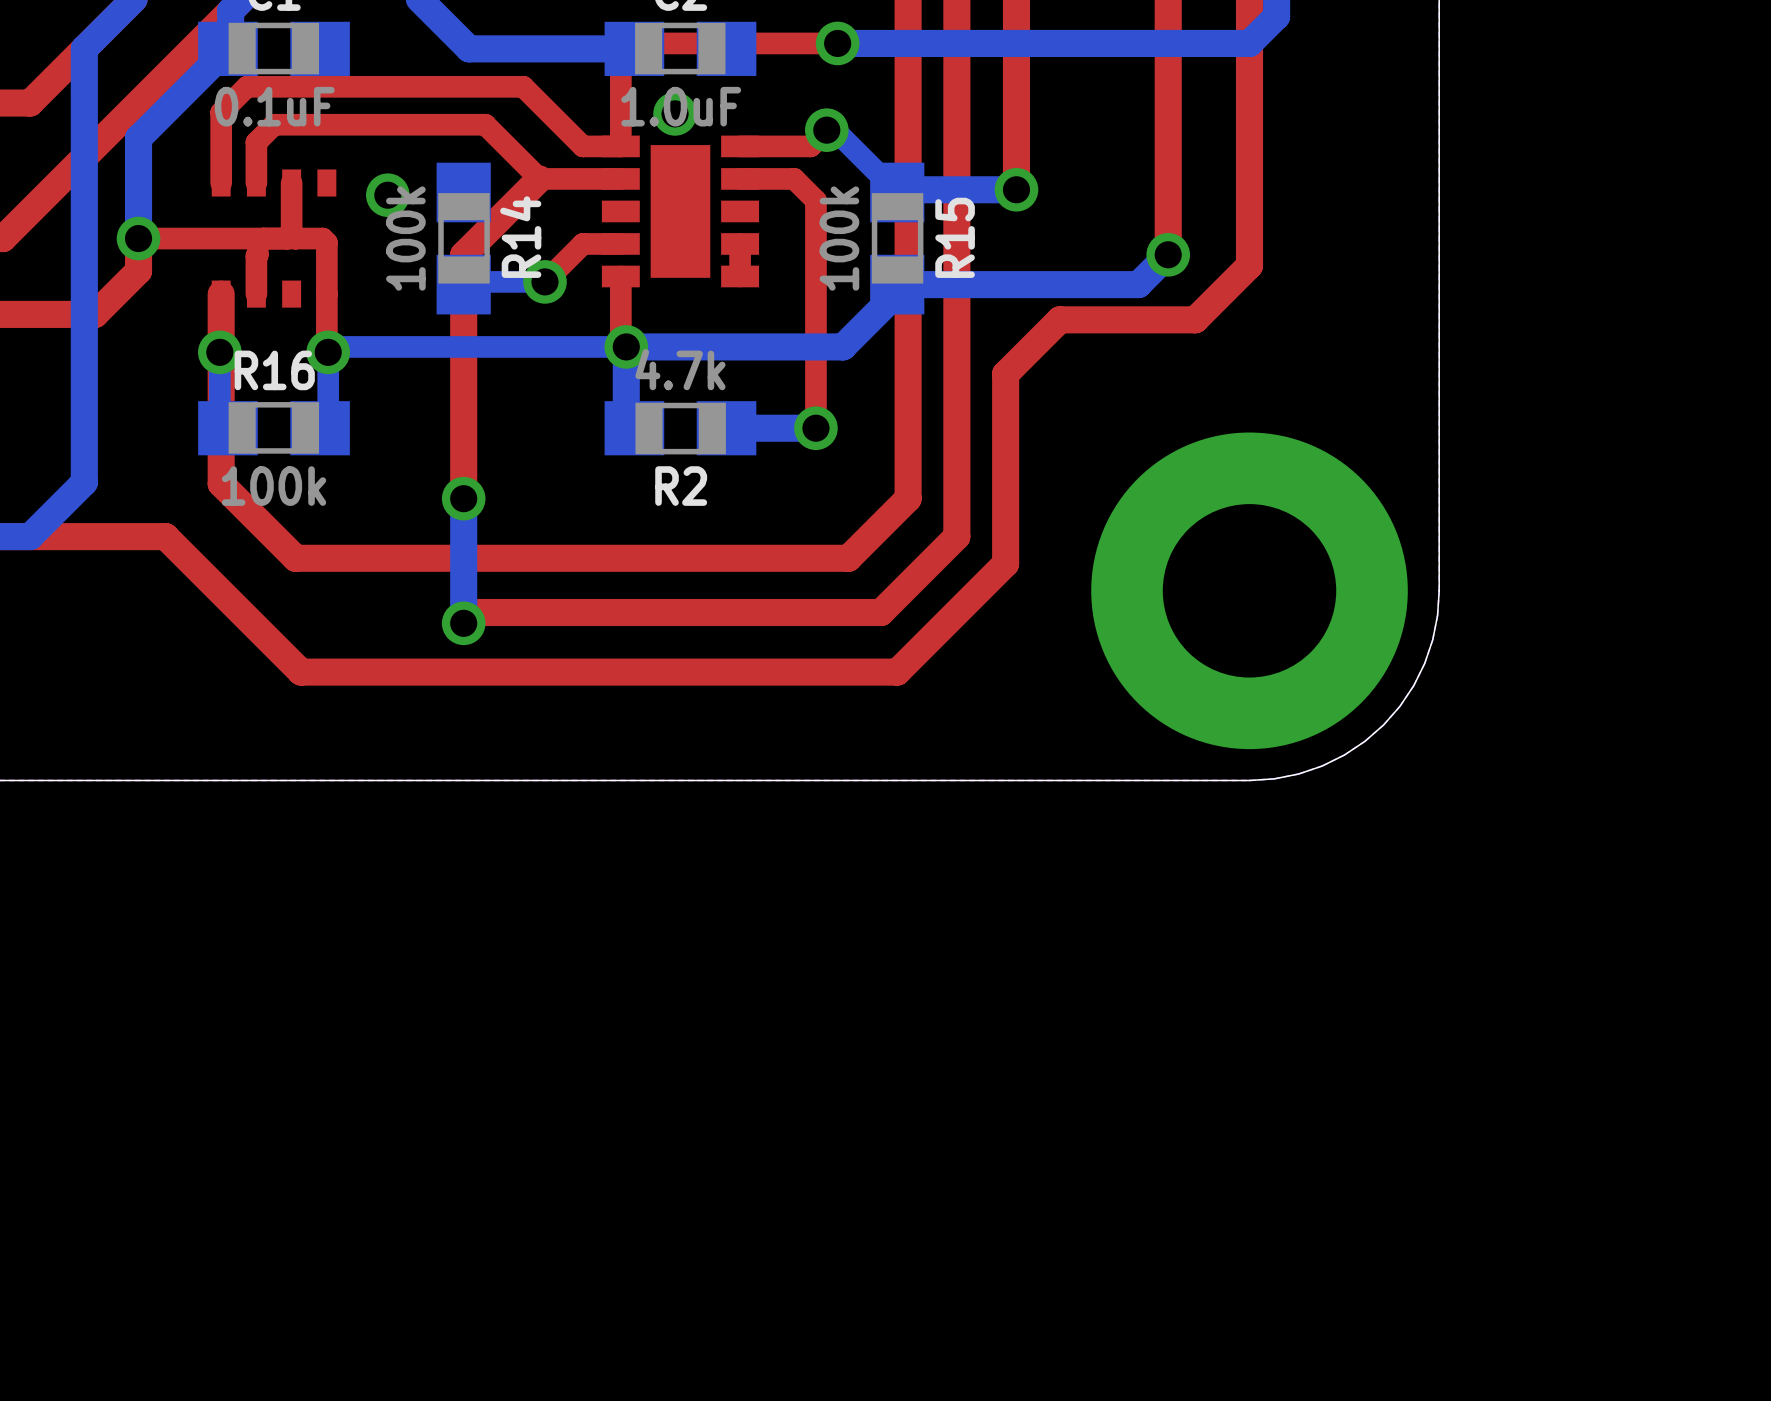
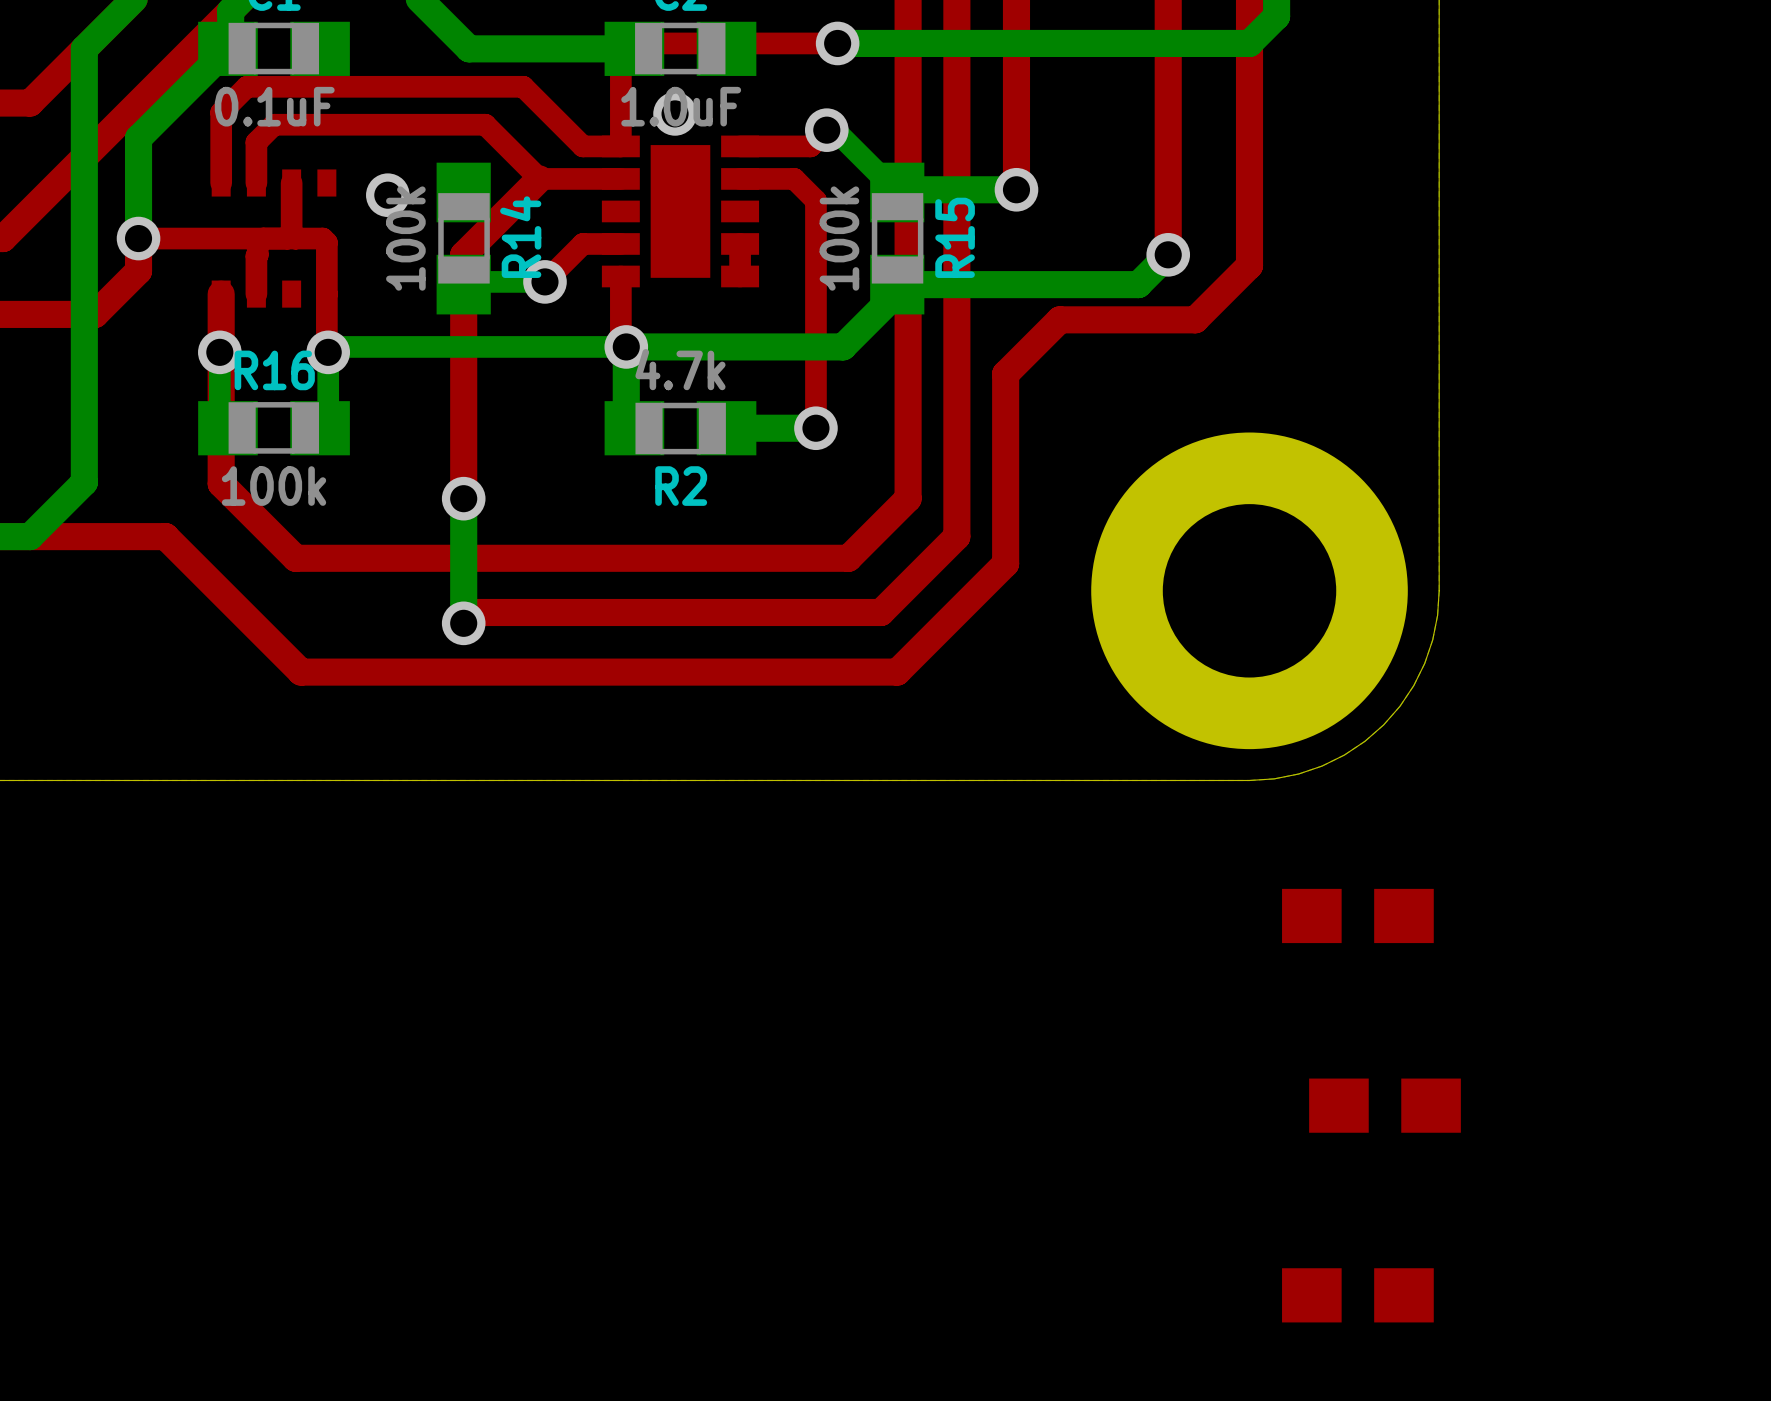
part: none -> (1357, 915)
part: none -> (1385, 1105)
part: none -> (1357, 1295)

